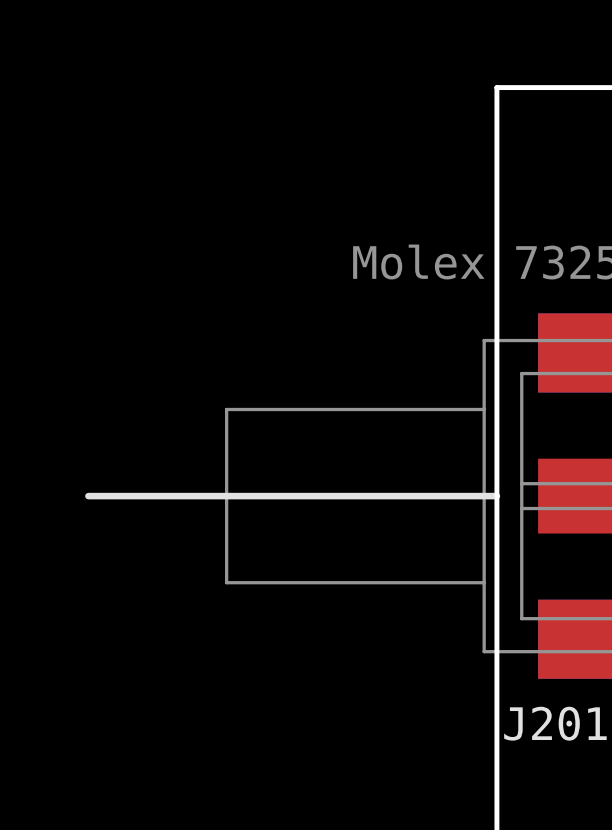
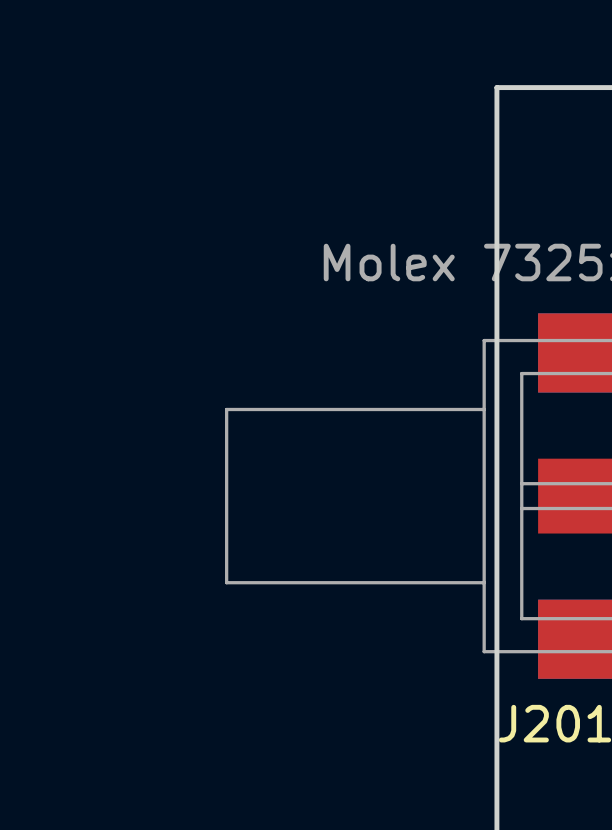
line: (88, 496) (496, 496) -> none

